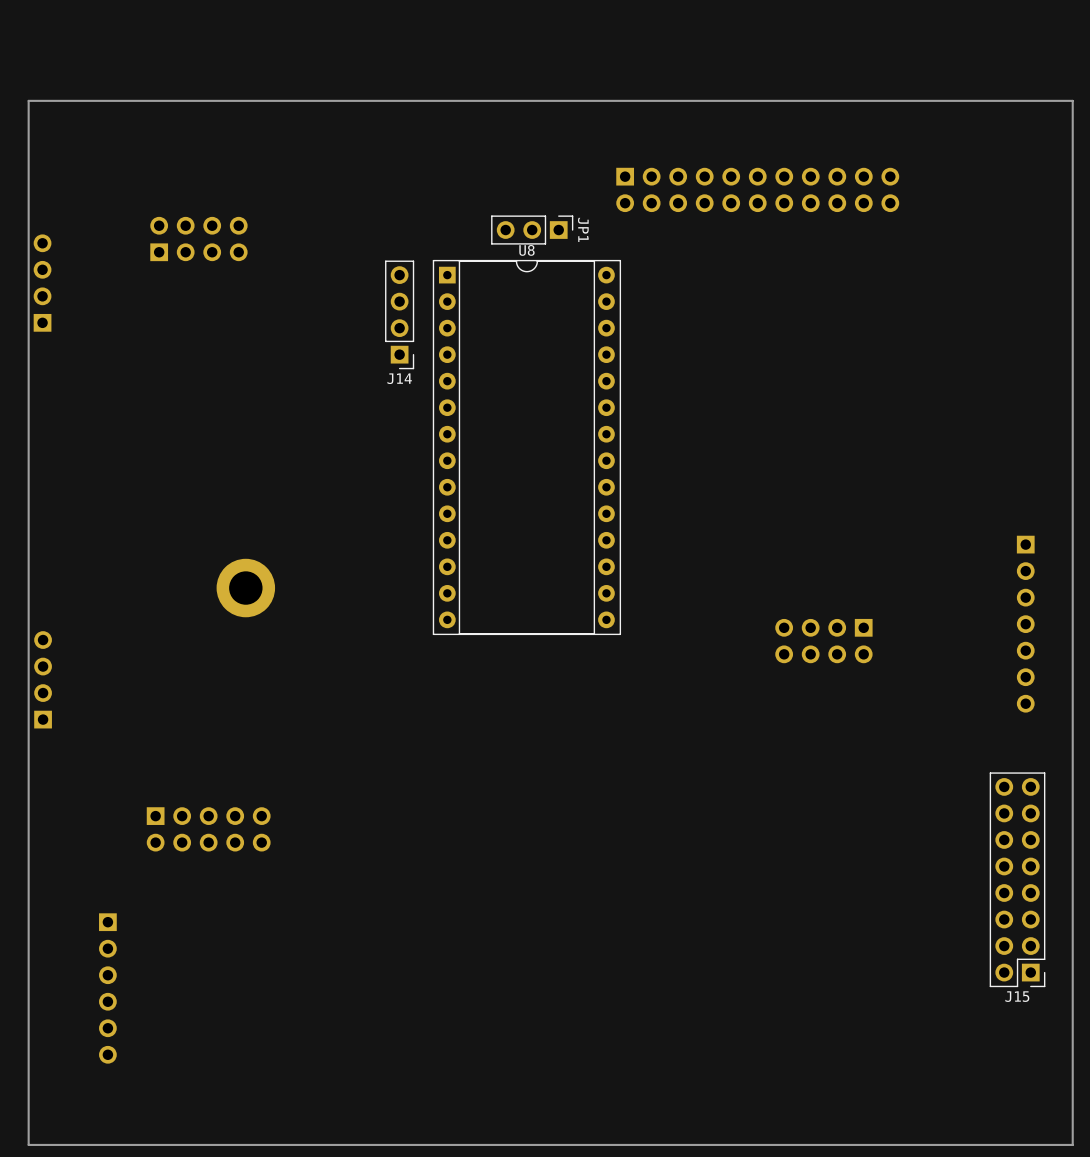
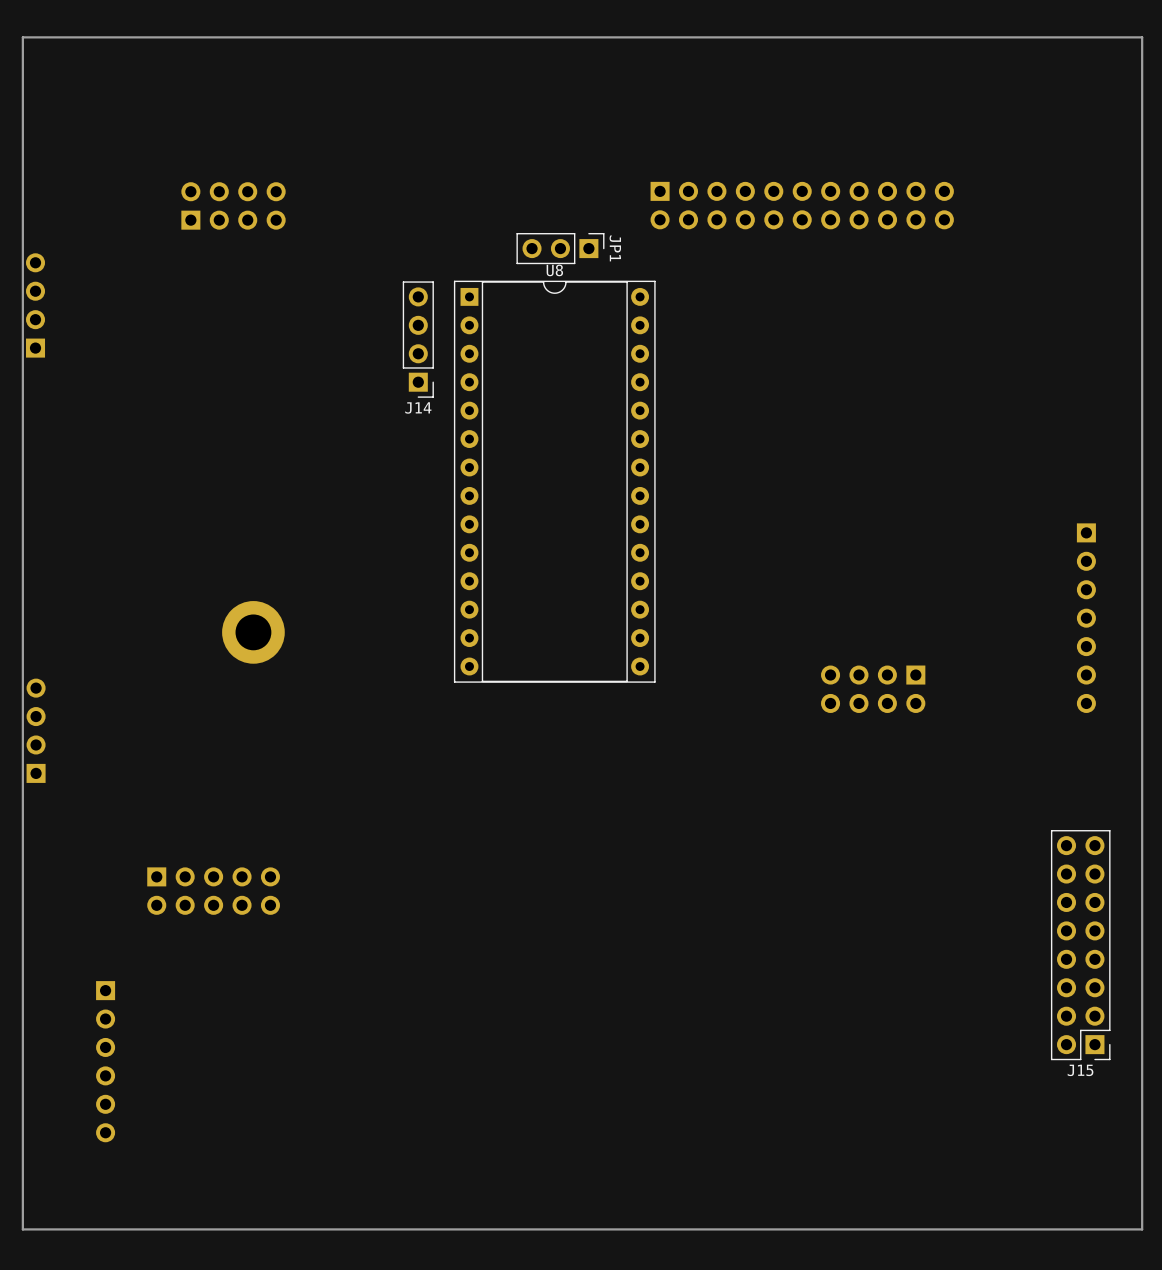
part position: (198, 239) -> (233, 205)
part position: (1025, 624) -> (1086, 618)
board edge: (1072, 1144) (1072, 100) (28, 100) (28, 1144) (30, 1144) -> (1139, 1229) (1142, 1229) (1142, 37) (22, 37) (22, 1229)

